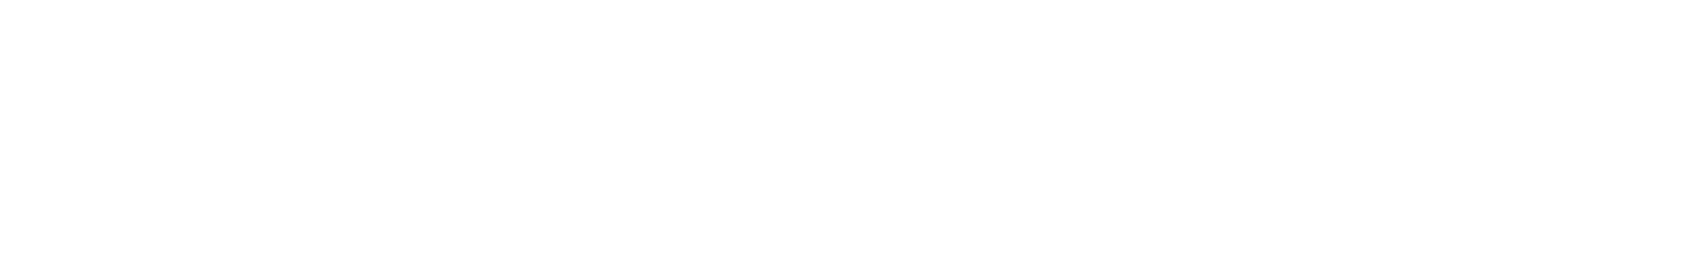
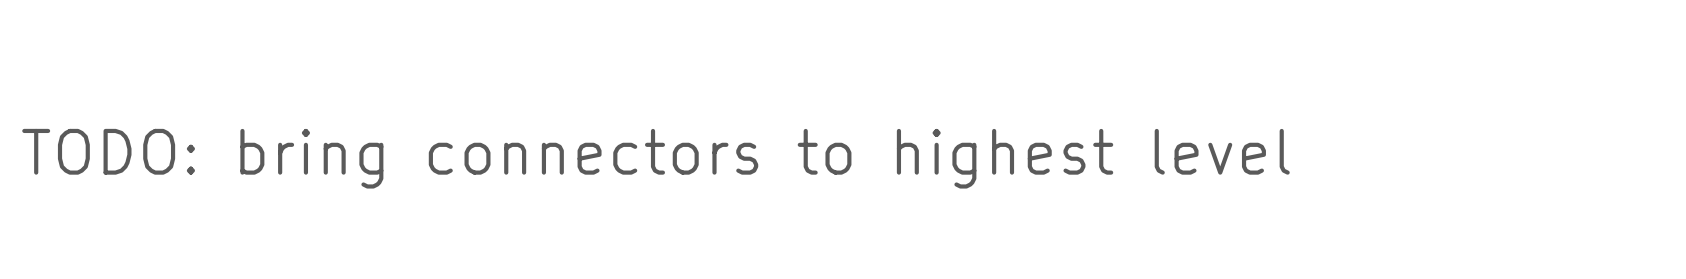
text: none -> TODO: bring connectors to highest level (655, 158)

